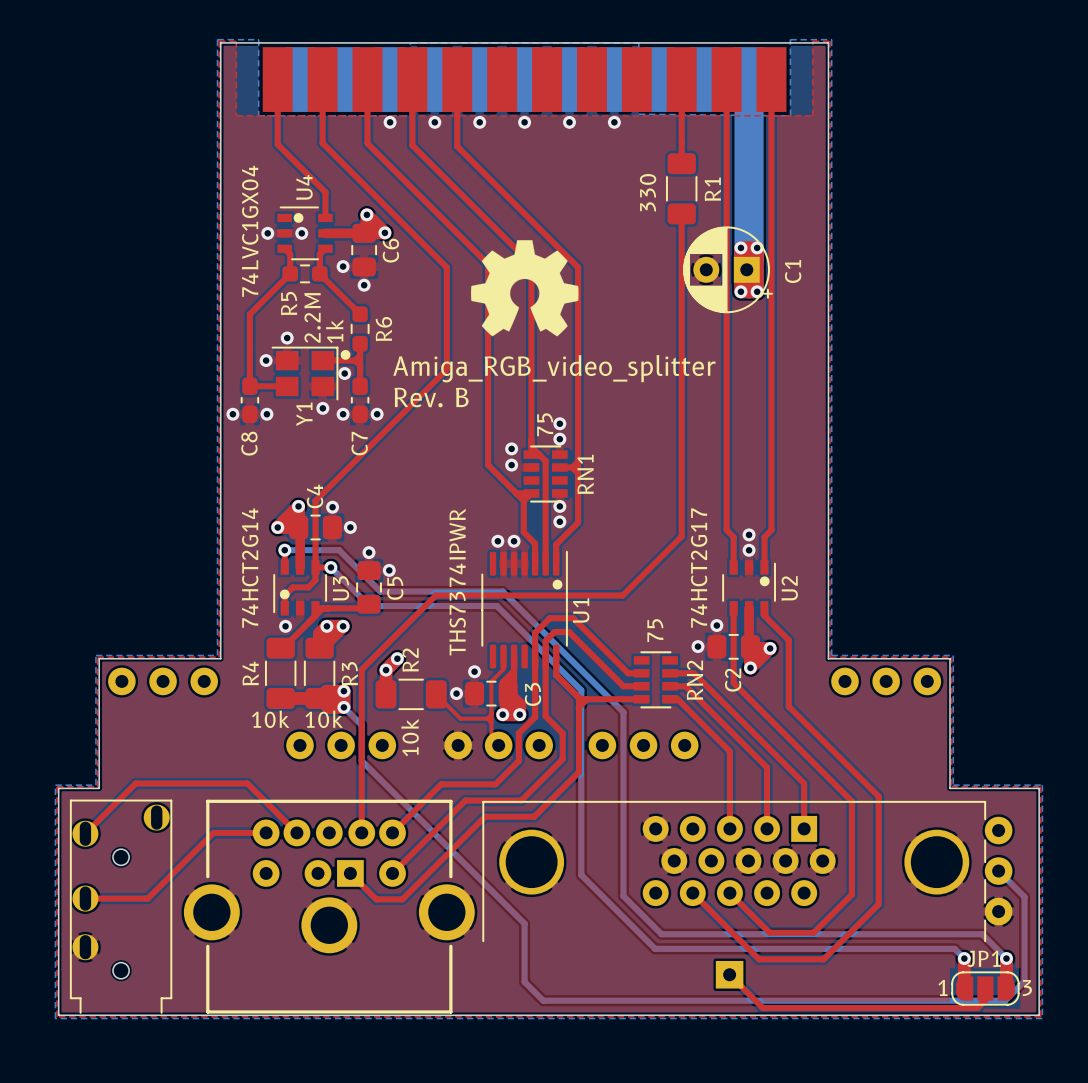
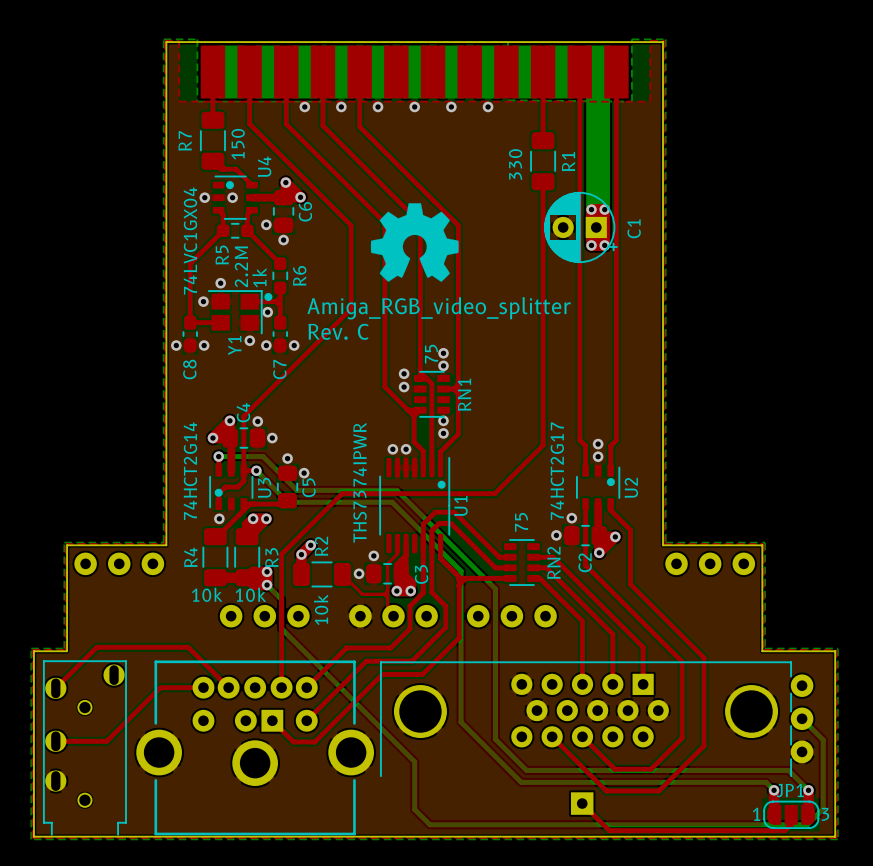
top track: (277, 138) (277, 144) (325, 192) (325, 217) -> (224, 169) (216, 161) (212, 161) (220, 169) (236, 169) (251, 185)
R7: none -> (212, 140)
text: none -> 150 (238, 144)
U4 name position: U4 (304, 187) -> U4 (264, 166)
text position: 74LVC1GX04 (250, 231) -> 74LVC1GX04 (190, 241)
text: Rev. B (431, 397) -> Rev. C (338, 331)

